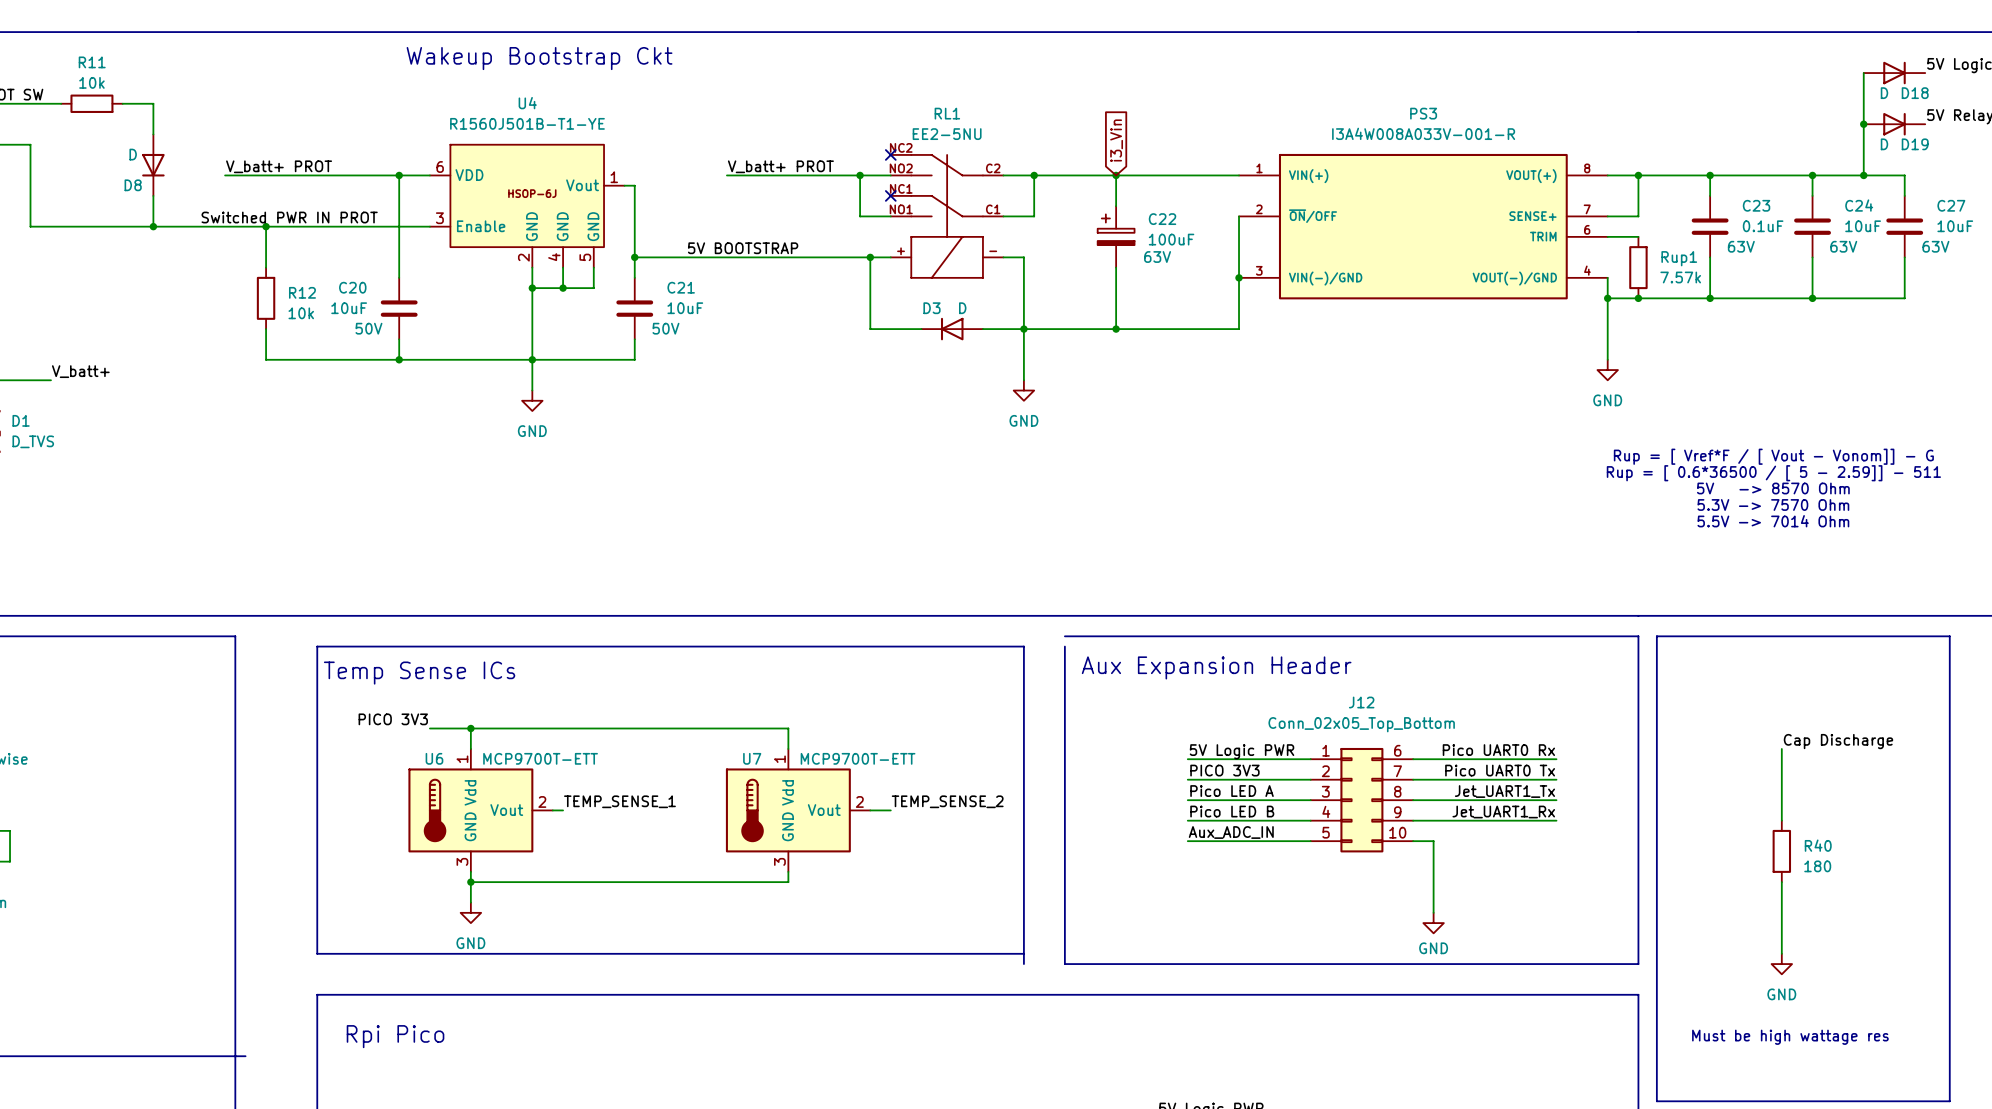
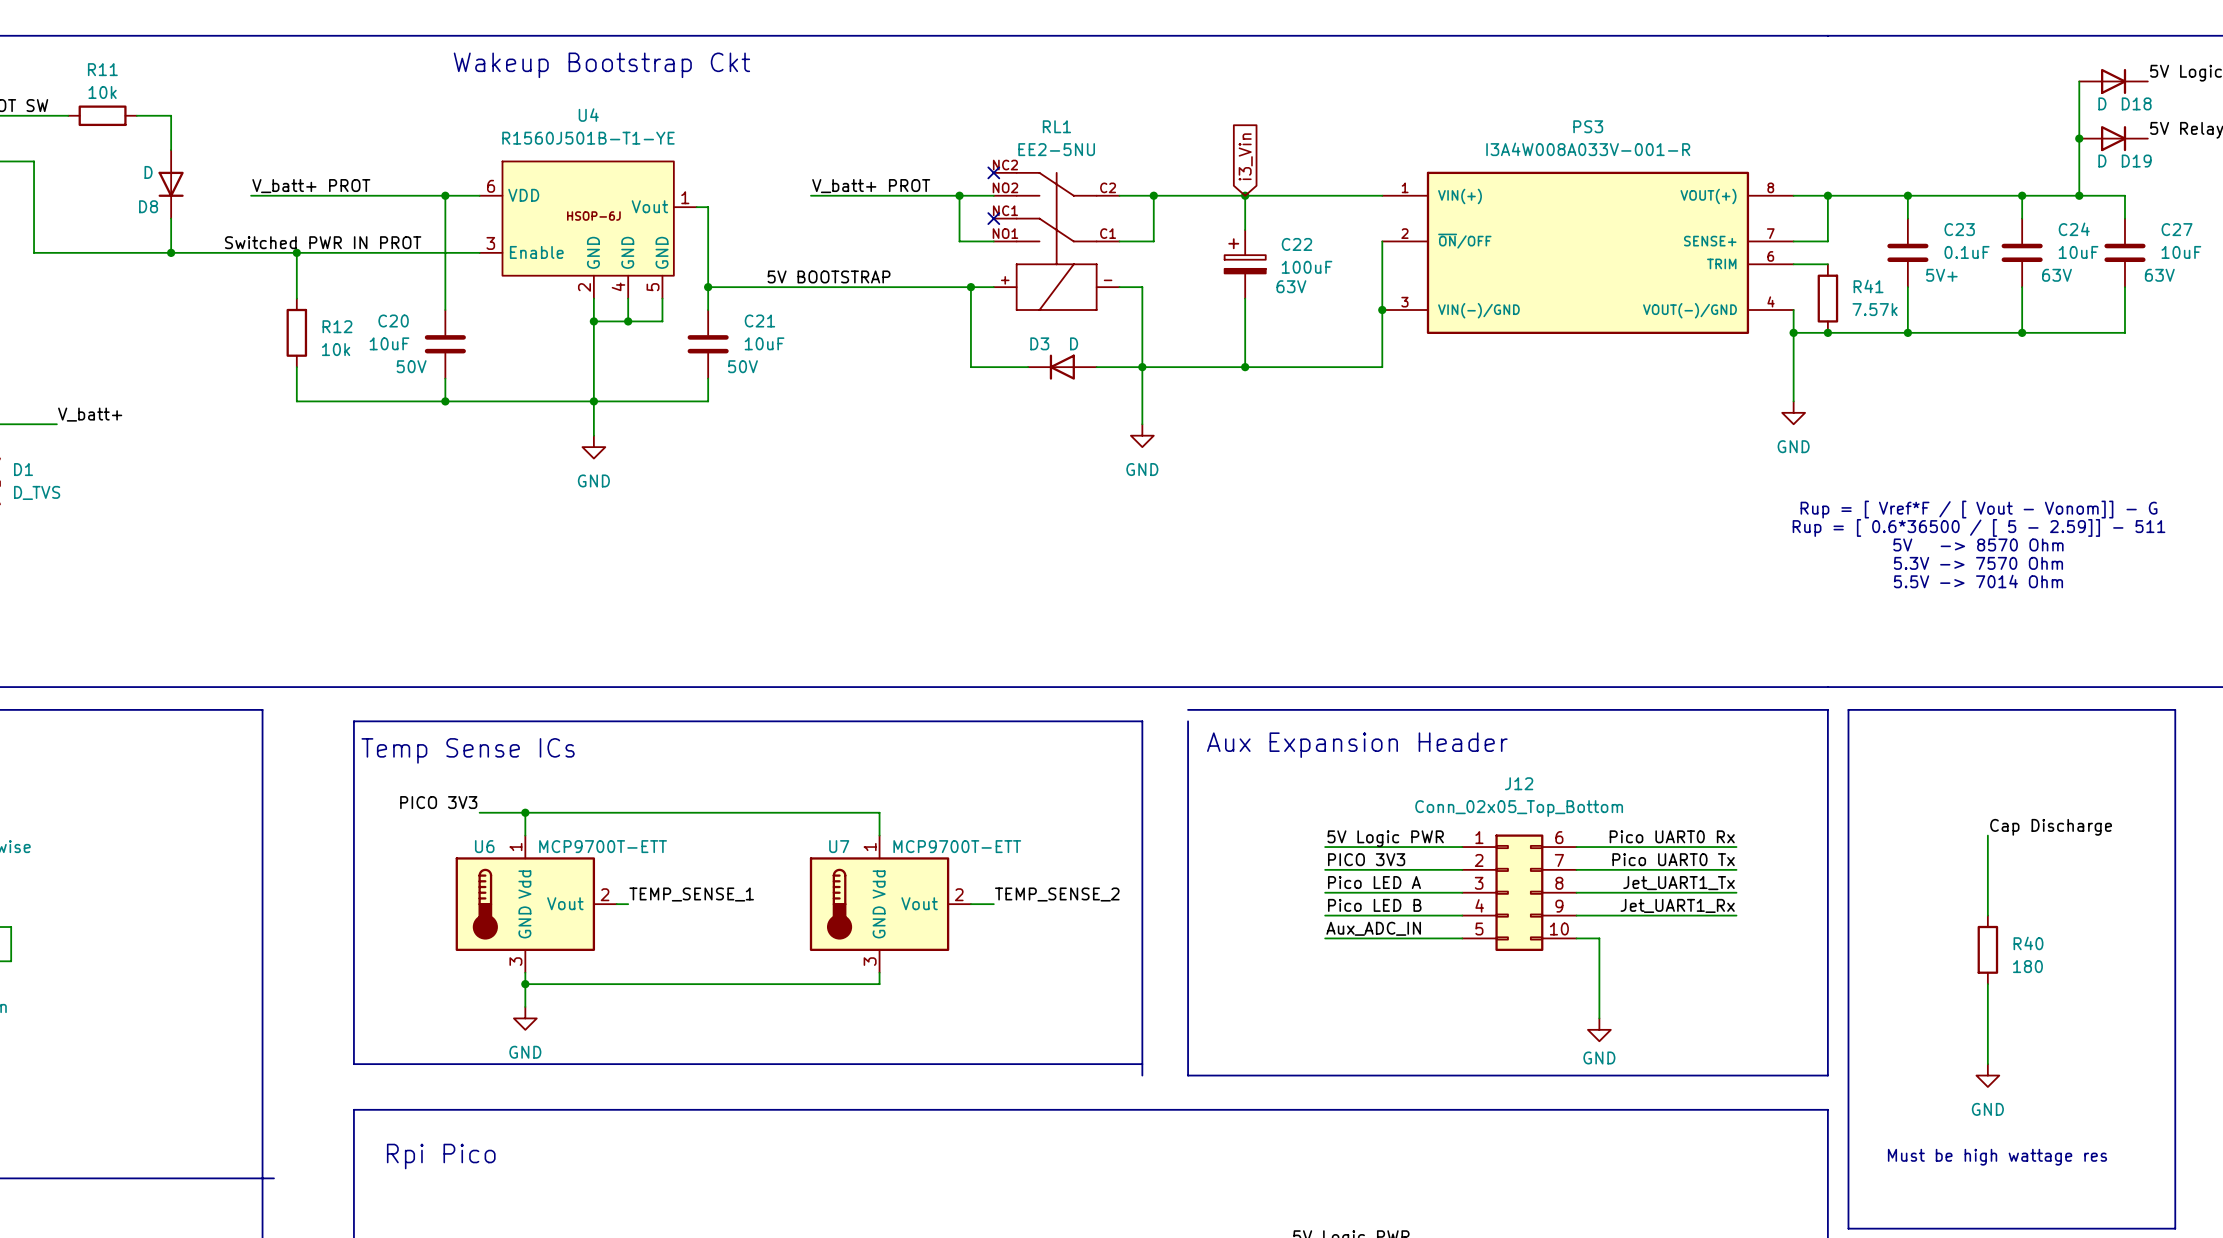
C23 text: 63V (1741, 246) -> 5V+ (1941, 275)
Rup1 name: Rup1 (1679, 258) -> R41 (1868, 286)

